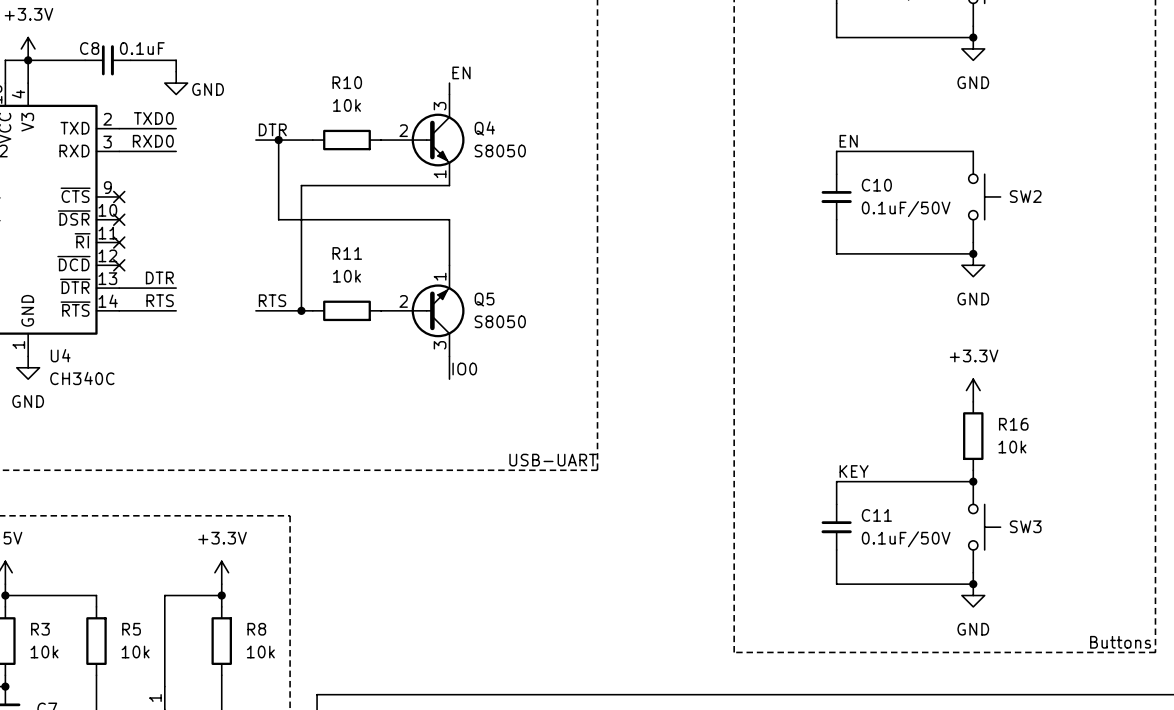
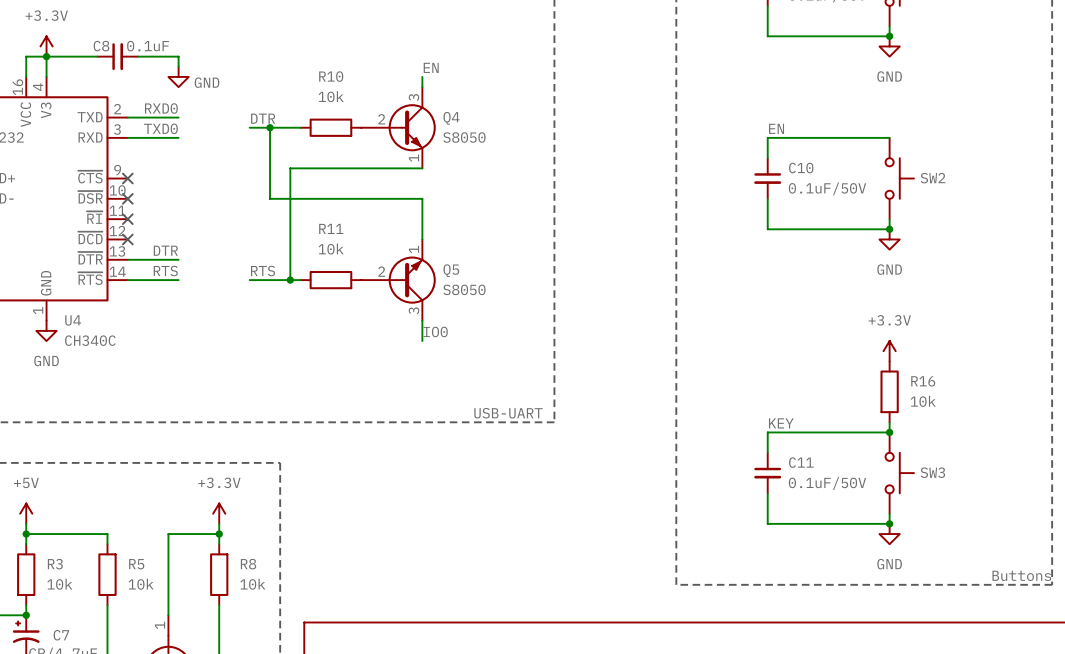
label: TXD0 (153, 118) -> RXD0 (161, 108)
label: RXD0 (153, 141) -> TXD0 (160, 128)

